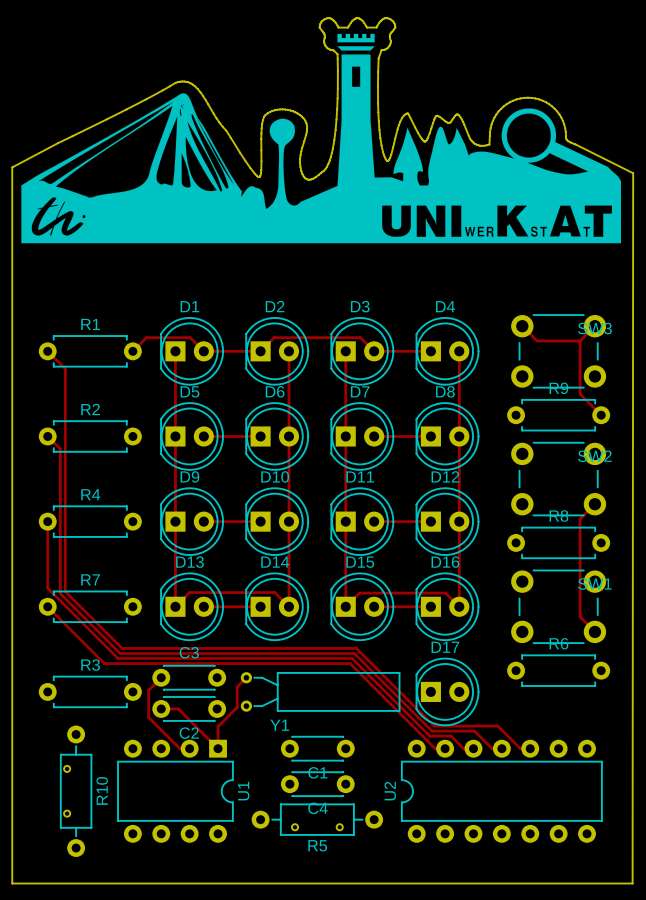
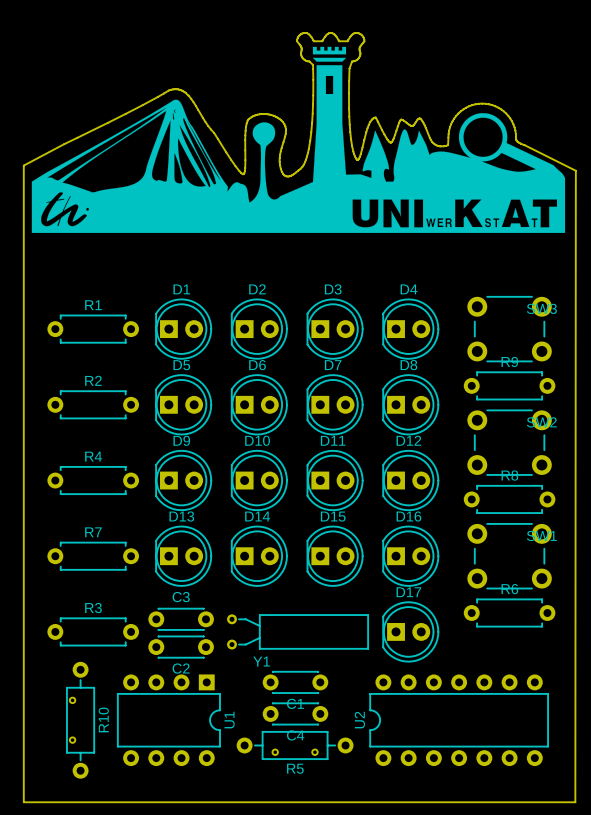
track: (522, 326) (537, 341) (580, 341) -> none
track: (594, 326) (580, 341) -> none
track: (580, 341) (580, 394) (601, 415) -> none
track: (47, 351) (65, 368) (65, 591) (122, 648) (356, 648) (434, 726) (497, 726) (520, 748) (530, 748) -> none
track: (132, 351) (146, 337) (190, 337) (203, 351) (260, 351) (274, 337) (360, 337) (374, 351) (430, 351) -> none
track: (175, 351) (175, 606) (189, 592) (274, 592) (288, 606) (288, 351) -> none
track: (345, 351) (345, 606) (359, 593) (445, 593) (459, 606) (459, 351) -> none
track: (47, 436) (60, 449) (60, 593) (120, 653) (354, 653) (431, 731) (474, 731) (492, 748) (501, 748) -> none
track: (203, 436) (260, 436) -> none
track: (374, 436) (430, 436) -> none
track: (594, 504) (580, 519) (580, 616) (594, 631) -> none
track: (47, 521) (47, 588) (118, 658) (352, 658) (429, 736) (451, 736) (463, 748) (473, 748) -> none
track: (203, 521) (260, 521) -> none
track: (374, 521) (430, 521) -> none
track: (47, 606) (104, 663) (350, 663) (435, 748) (445, 748) -> none
track: (203, 606) (260, 606) -> none
track: (374, 606) (430, 606) -> none
track: (161, 677) (148, 690) (148, 717) (179, 748) (189, 748) -> none
track: (246, 677) (237, 686) (237, 707) (218, 726) (218, 748) (178, 708) (161, 708) -> none

